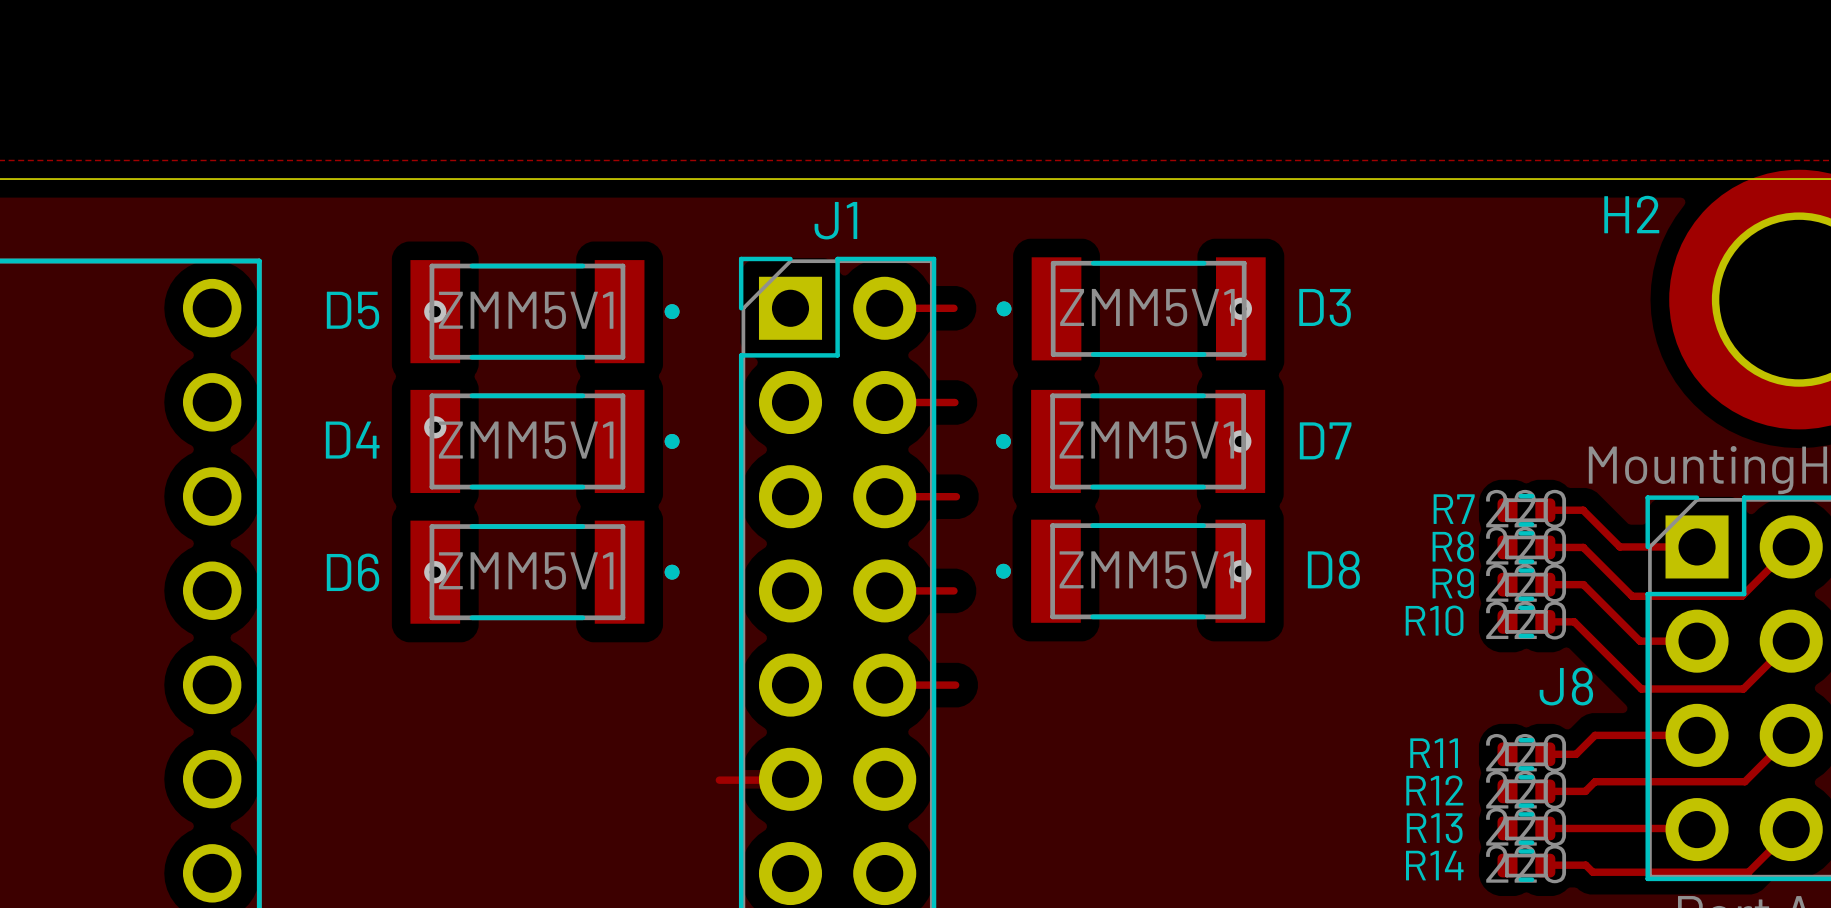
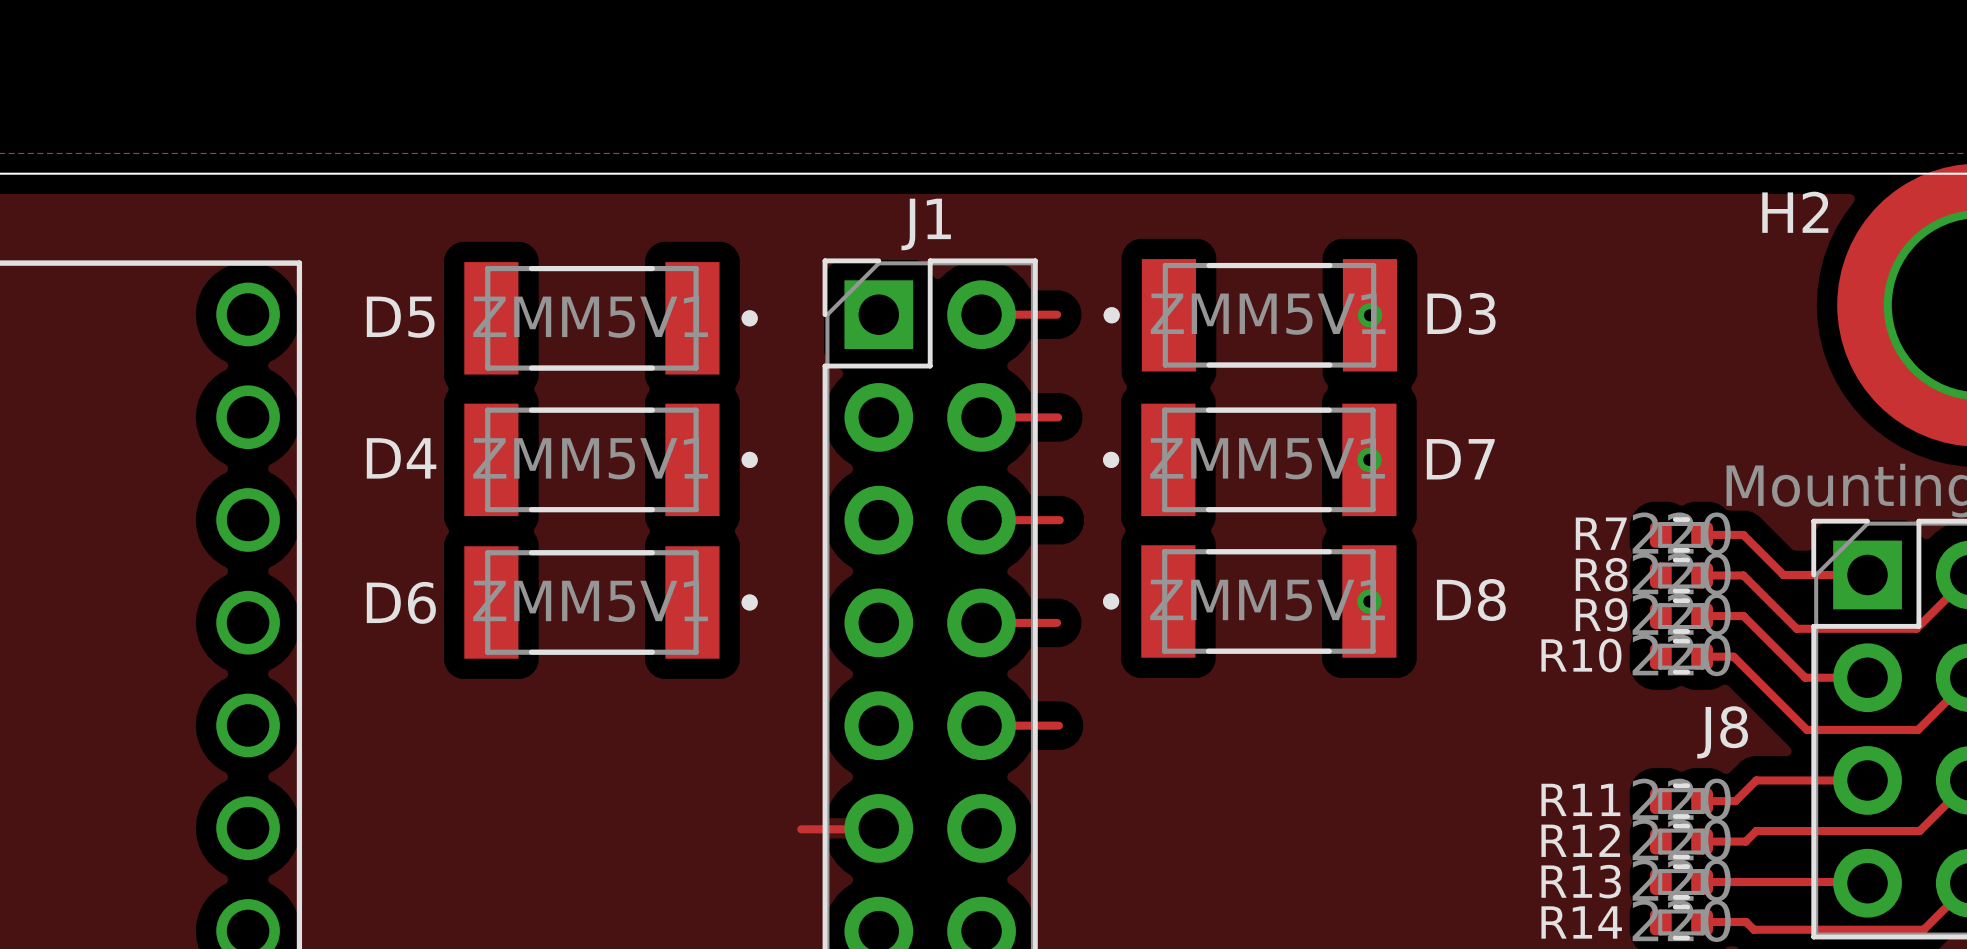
via: (435, 311) -> none
via: (435, 427) -> none
via: (435, 572) -> none

